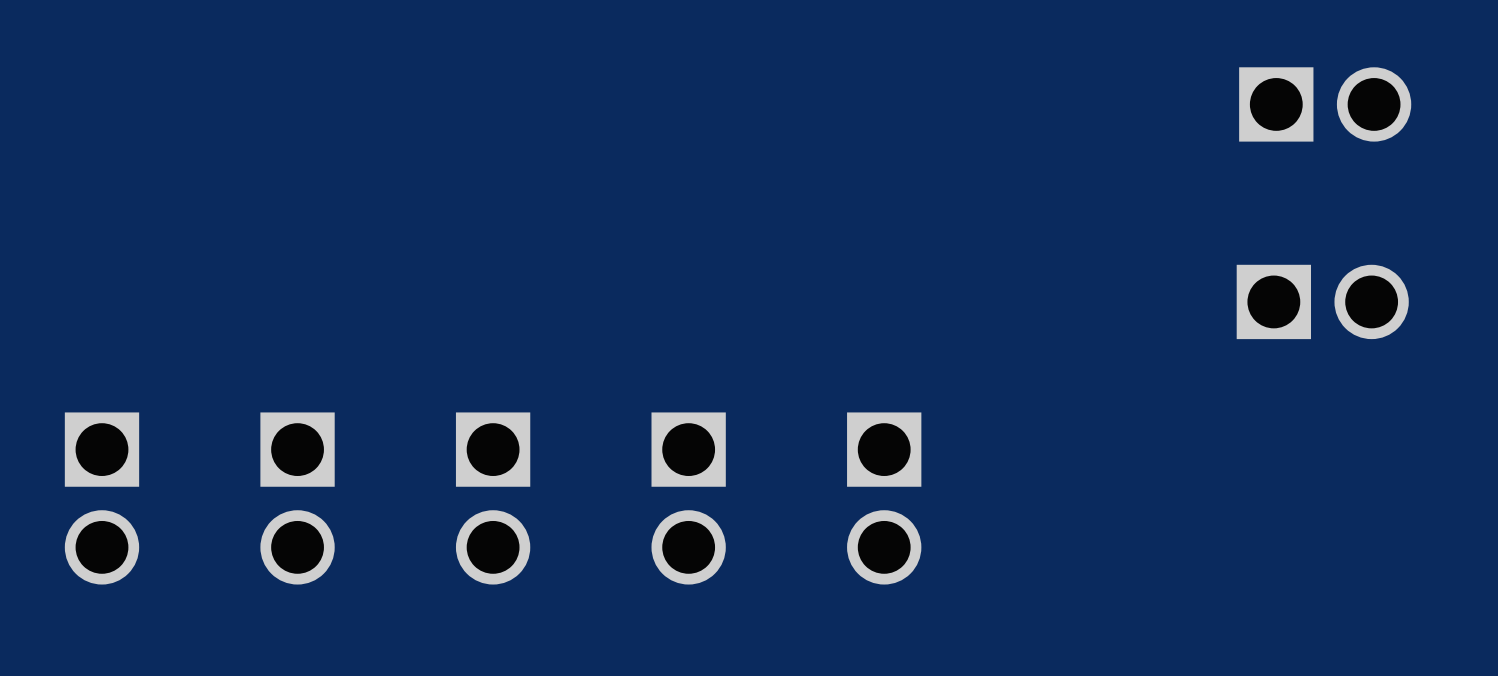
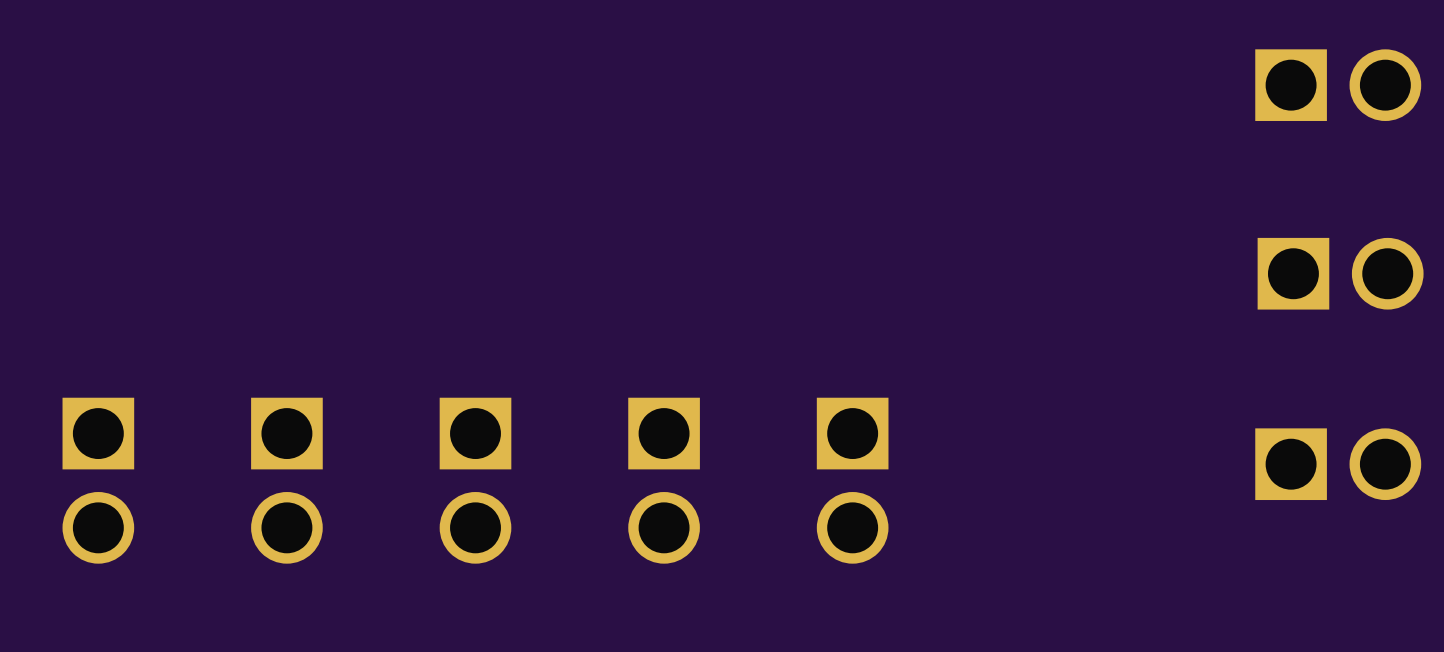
part position: (1325, 104) -> (1338, 85)
part position: (1322, 301) -> (1340, 273)
part: none -> (1338, 464)

